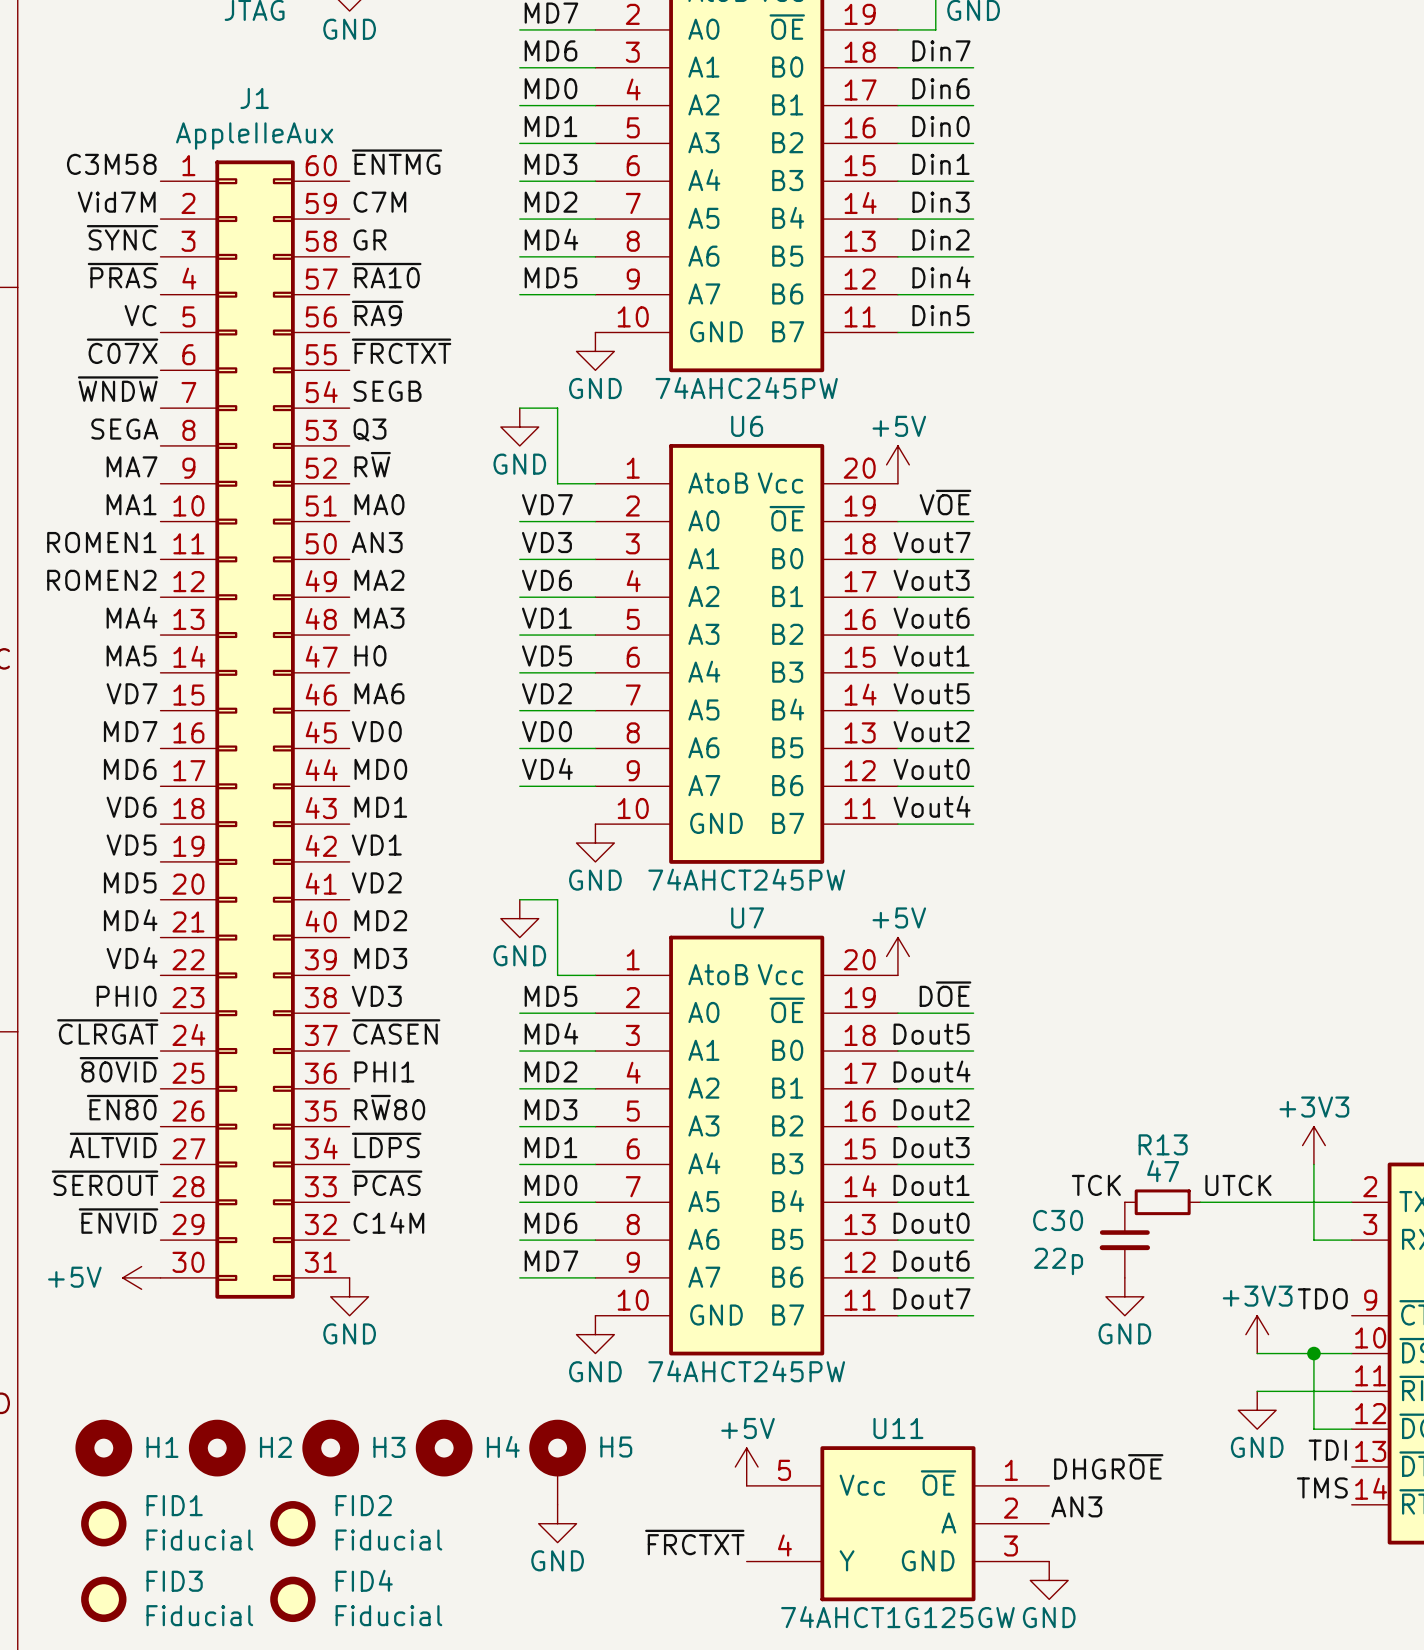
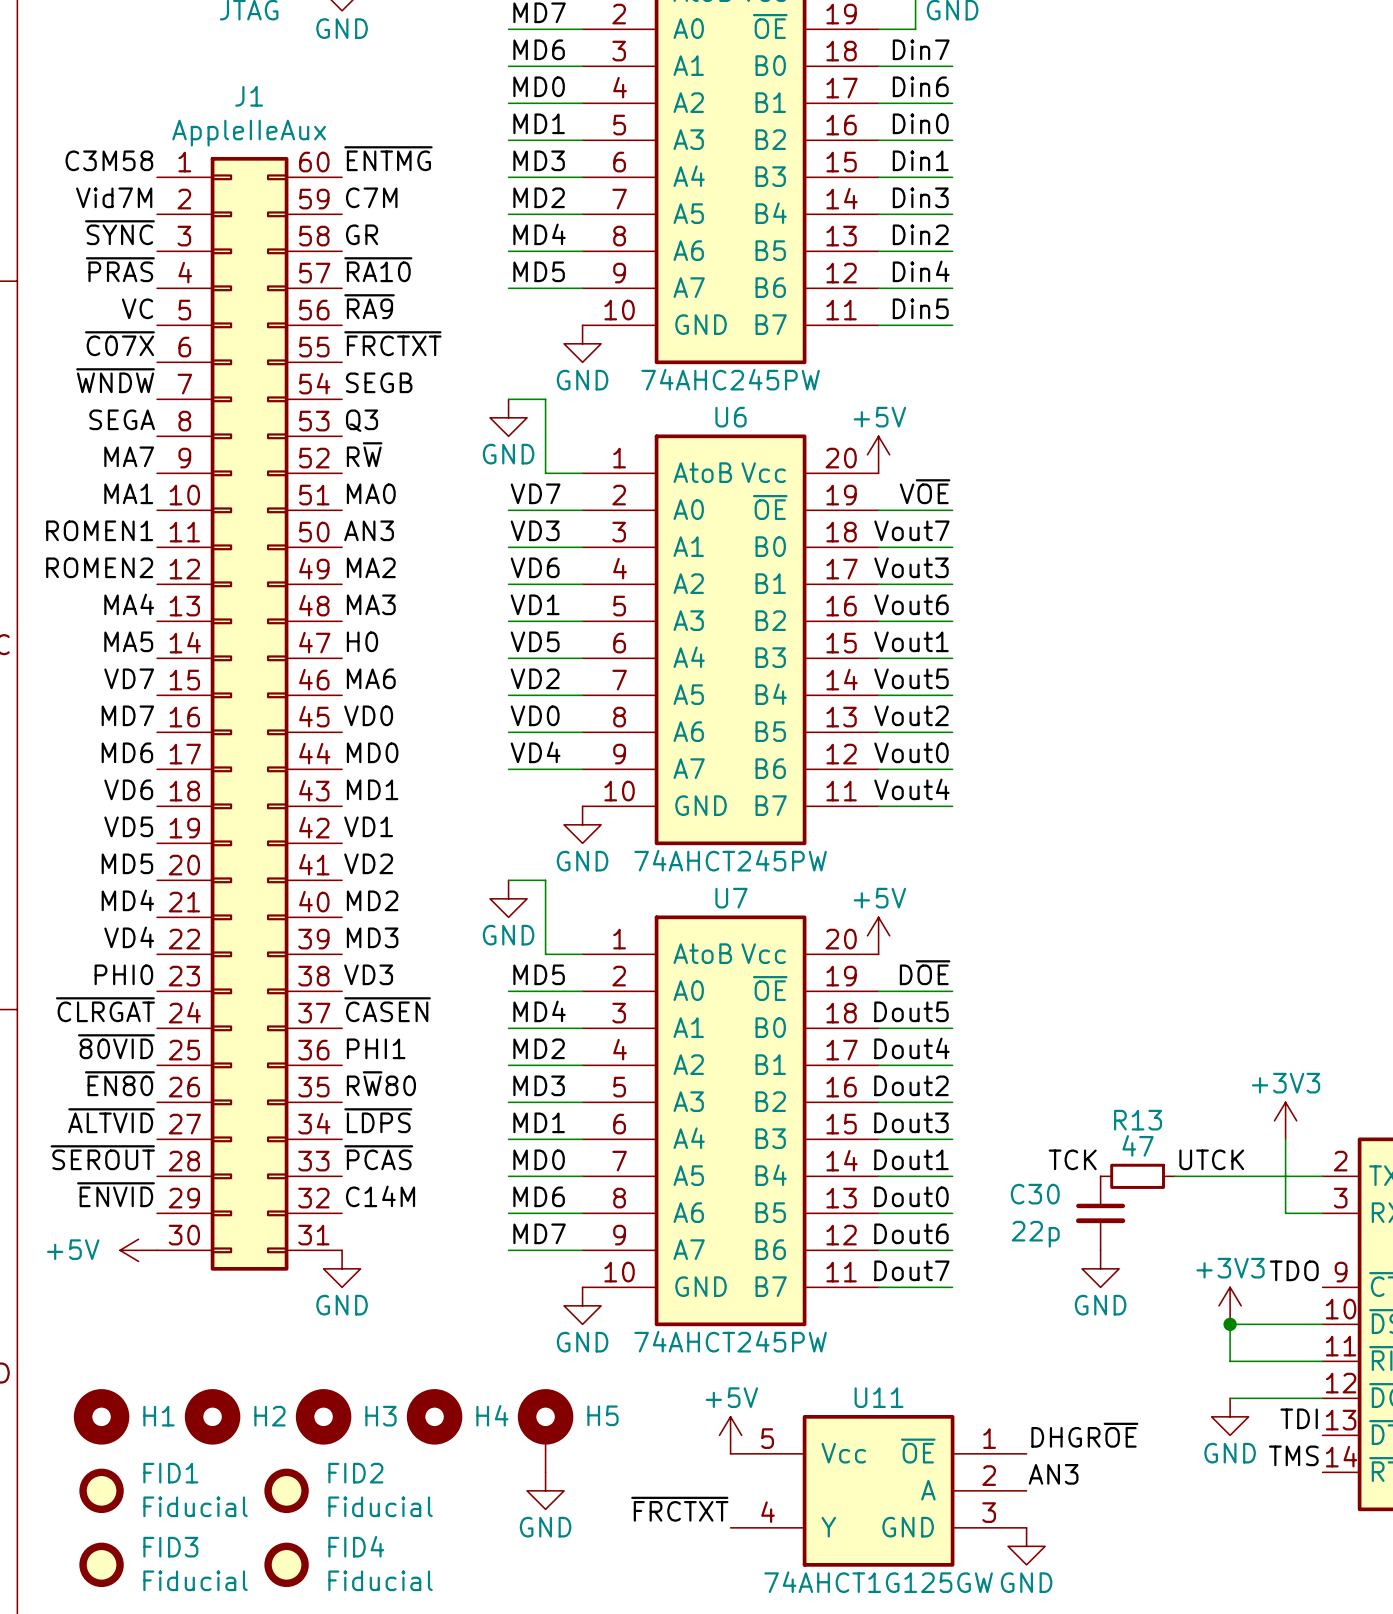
wire: none -> (1230, 1324) (1230, 1361)
wire: (1313, 1353) (1313, 1429) -> (1230, 1398) (1285, 1398)
junction position: (1313, 1353) -> (1230, 1324)
power symbol position: GND (1257, 1410) -> GND (1230, 1416)

